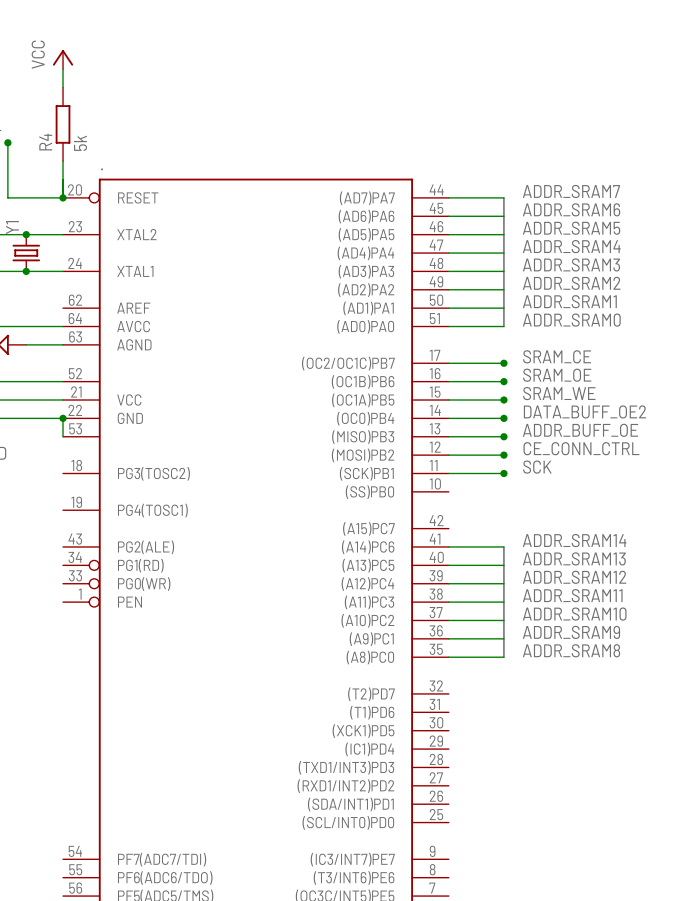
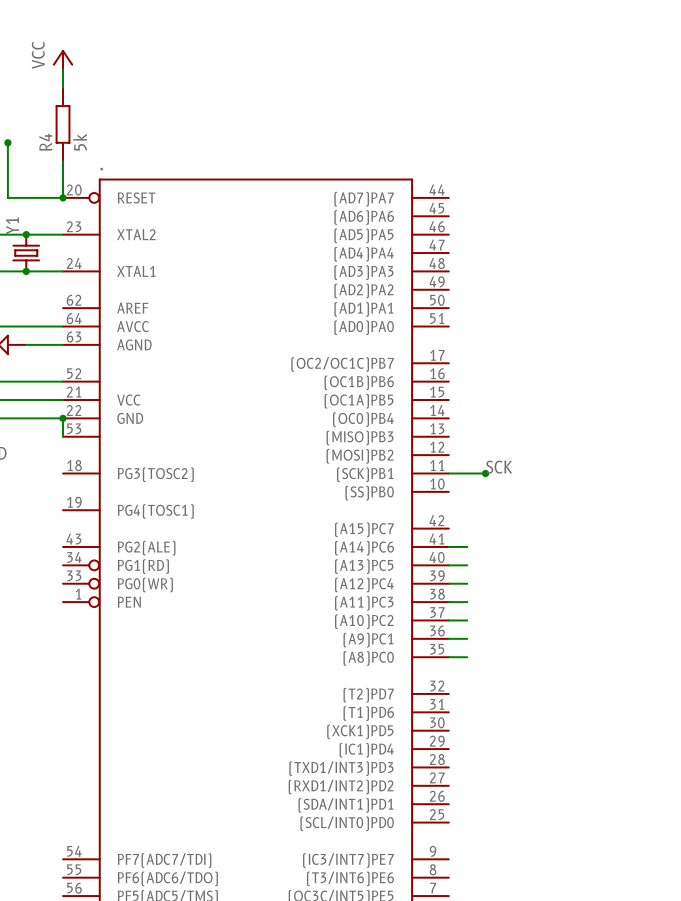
label: ADDR_SRAM7 (571, 191) -> none
wire: (448, 197) (503, 197) -> none
bus: (503, 197) (503, 326) -> none
label: ADDR_SRAM6 (571, 209) -> none
wire: (448, 216) (503, 216) -> none
label: ADDR_SRAM5 (571, 228) -> none
wire: (448, 234) (503, 234) -> none
label: ADDR_SRAM4 (571, 246) -> none
wire: (448, 253) (503, 253) -> none
label: ADDR_SRAM3 (571, 264) -> none
wire: (448, 271) (503, 271) -> none
label: ADDR_SRAM2 (571, 283) -> none
wire: (448, 289) (503, 289) -> none
label: ADDR_SRAM1 (569, 301) -> none
wire: (448, 308) (503, 308) -> none
label: ADDR_SRAM0 (571, 320) -> none
wire: (448, 326) (503, 326) -> none
label: SRAM_CE (557, 356) -> none
wire: (448, 363) (503, 363) -> none
junction: (503, 363) -> none
label: SRAM_OE (557, 375) -> none
wire: (448, 381) (503, 381) -> none
junction: (503, 381) -> none
label: SRAM_WE (559, 393) -> none
wire: (448, 400) (503, 400) -> none
junction: (503, 400) -> none
label: DATA_BUFF_OE2 (584, 411) -> none
wire: (448, 418) (503, 418) -> none
junction: (503, 418) -> none
label: ADDR_BUFF_OE (580, 430) -> none
wire: (448, 436) (503, 436) -> none
junction: (503, 436) -> none
label: CE_CONN_CTRL (581, 448) -> none
wire: (448, 455) (503, 455) -> none
junction: (503, 455) -> none
label position: SCK (537, 467) -> SCK (499, 467)
wire: (485, 473) (503, 473) -> none
junction: none -> (485, 473)
junction: (503, 473) -> none
label: ADDR_SRAM14 (574, 540) -> none
wire: (467, 546) (503, 546) -> none
bus: (503, 546) (503, 657) -> none
label: ADDR_SRAM13 (574, 558) -> none
wire: (467, 565) (503, 565) -> none
label: ADDR_SRAM12 (574, 577) -> none
wire: (467, 583) (503, 583) -> none
label: ADDR_SRAM11 (572, 595) -> none
wire: (467, 602) (503, 602) -> none
label: ADDR_SRAM10 (574, 614) -> none
wire: (467, 620) (503, 620) -> none
label: ADDR_SRAM9 (571, 632) -> none
wire: (467, 638) (503, 638) -> none
label: ADDR_SRAM8 (571, 650) -> none
wire: (467, 657) (503, 657) -> none

